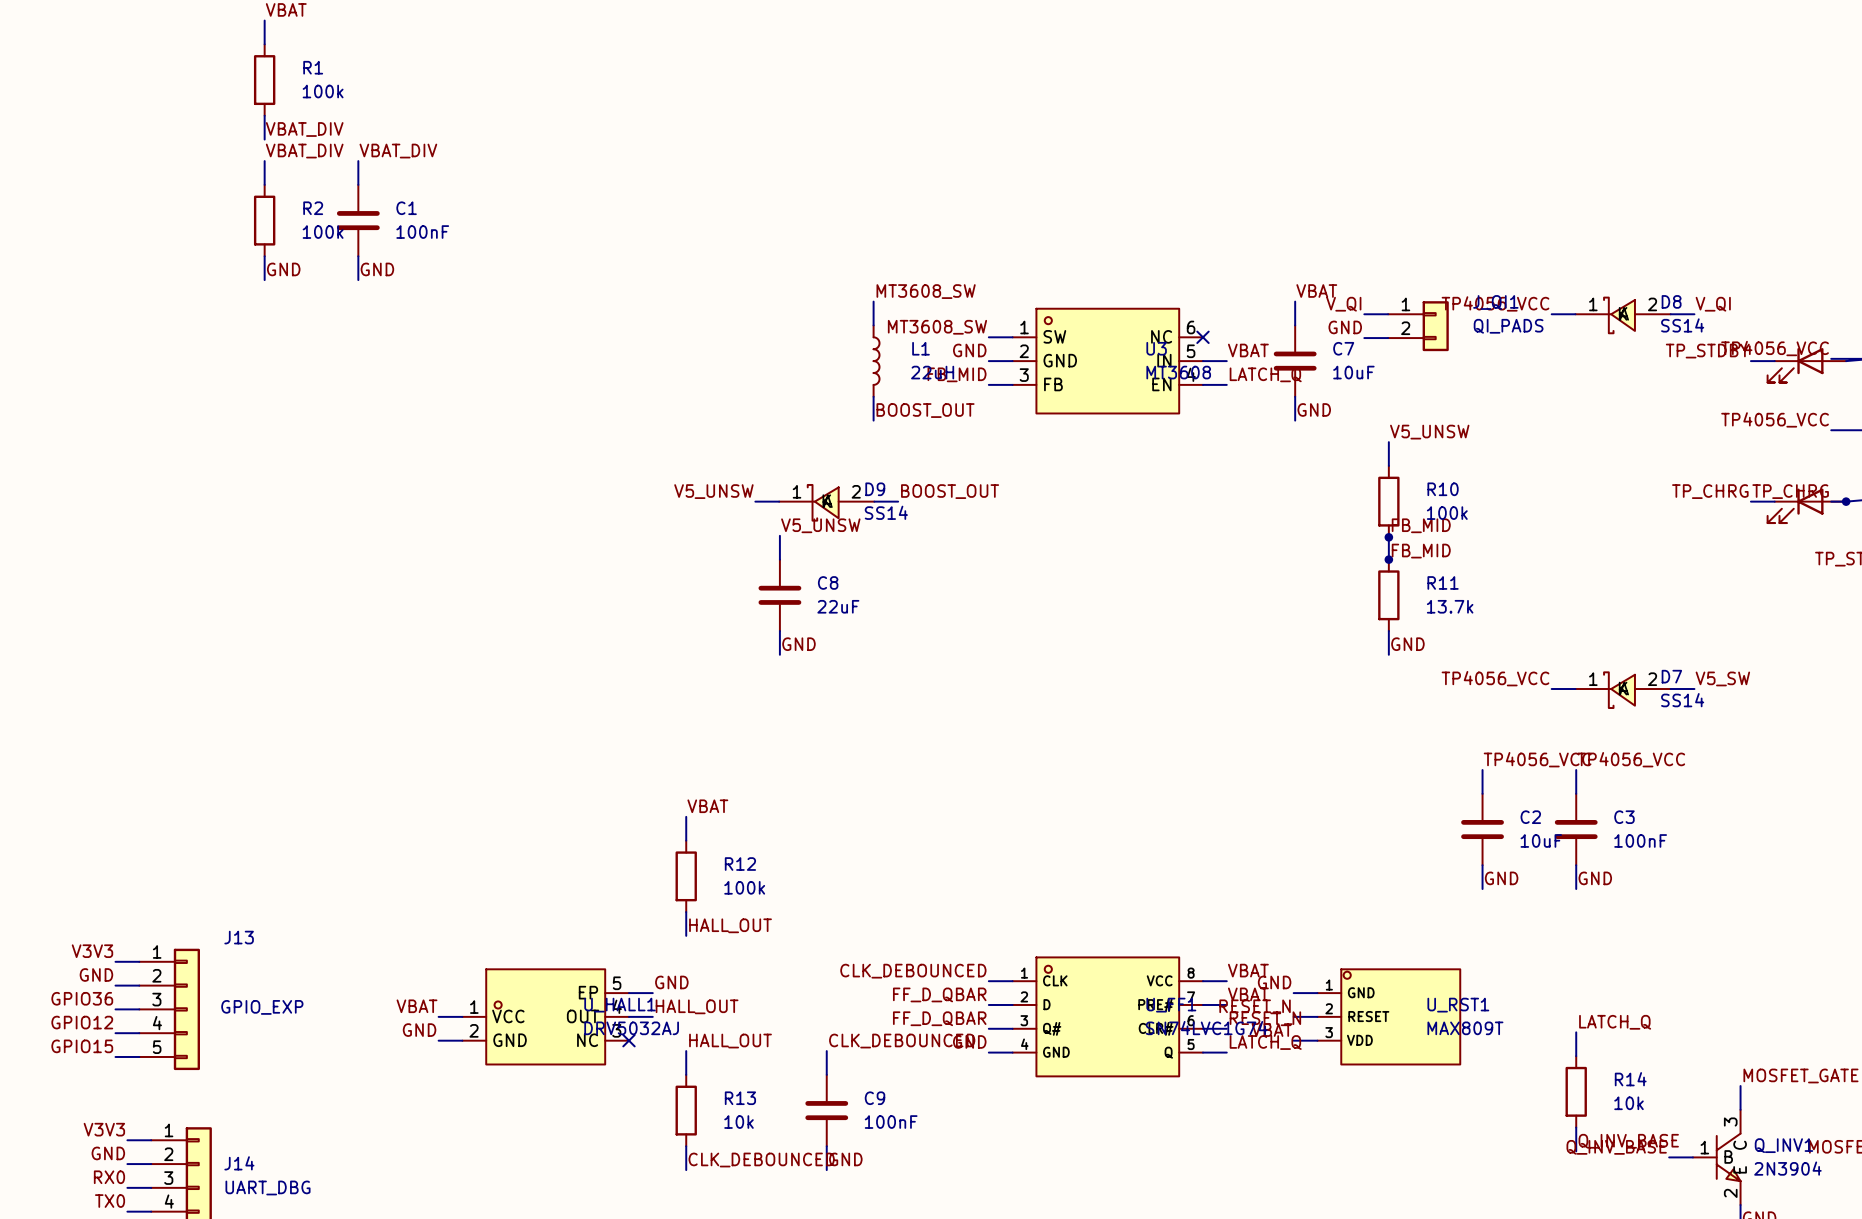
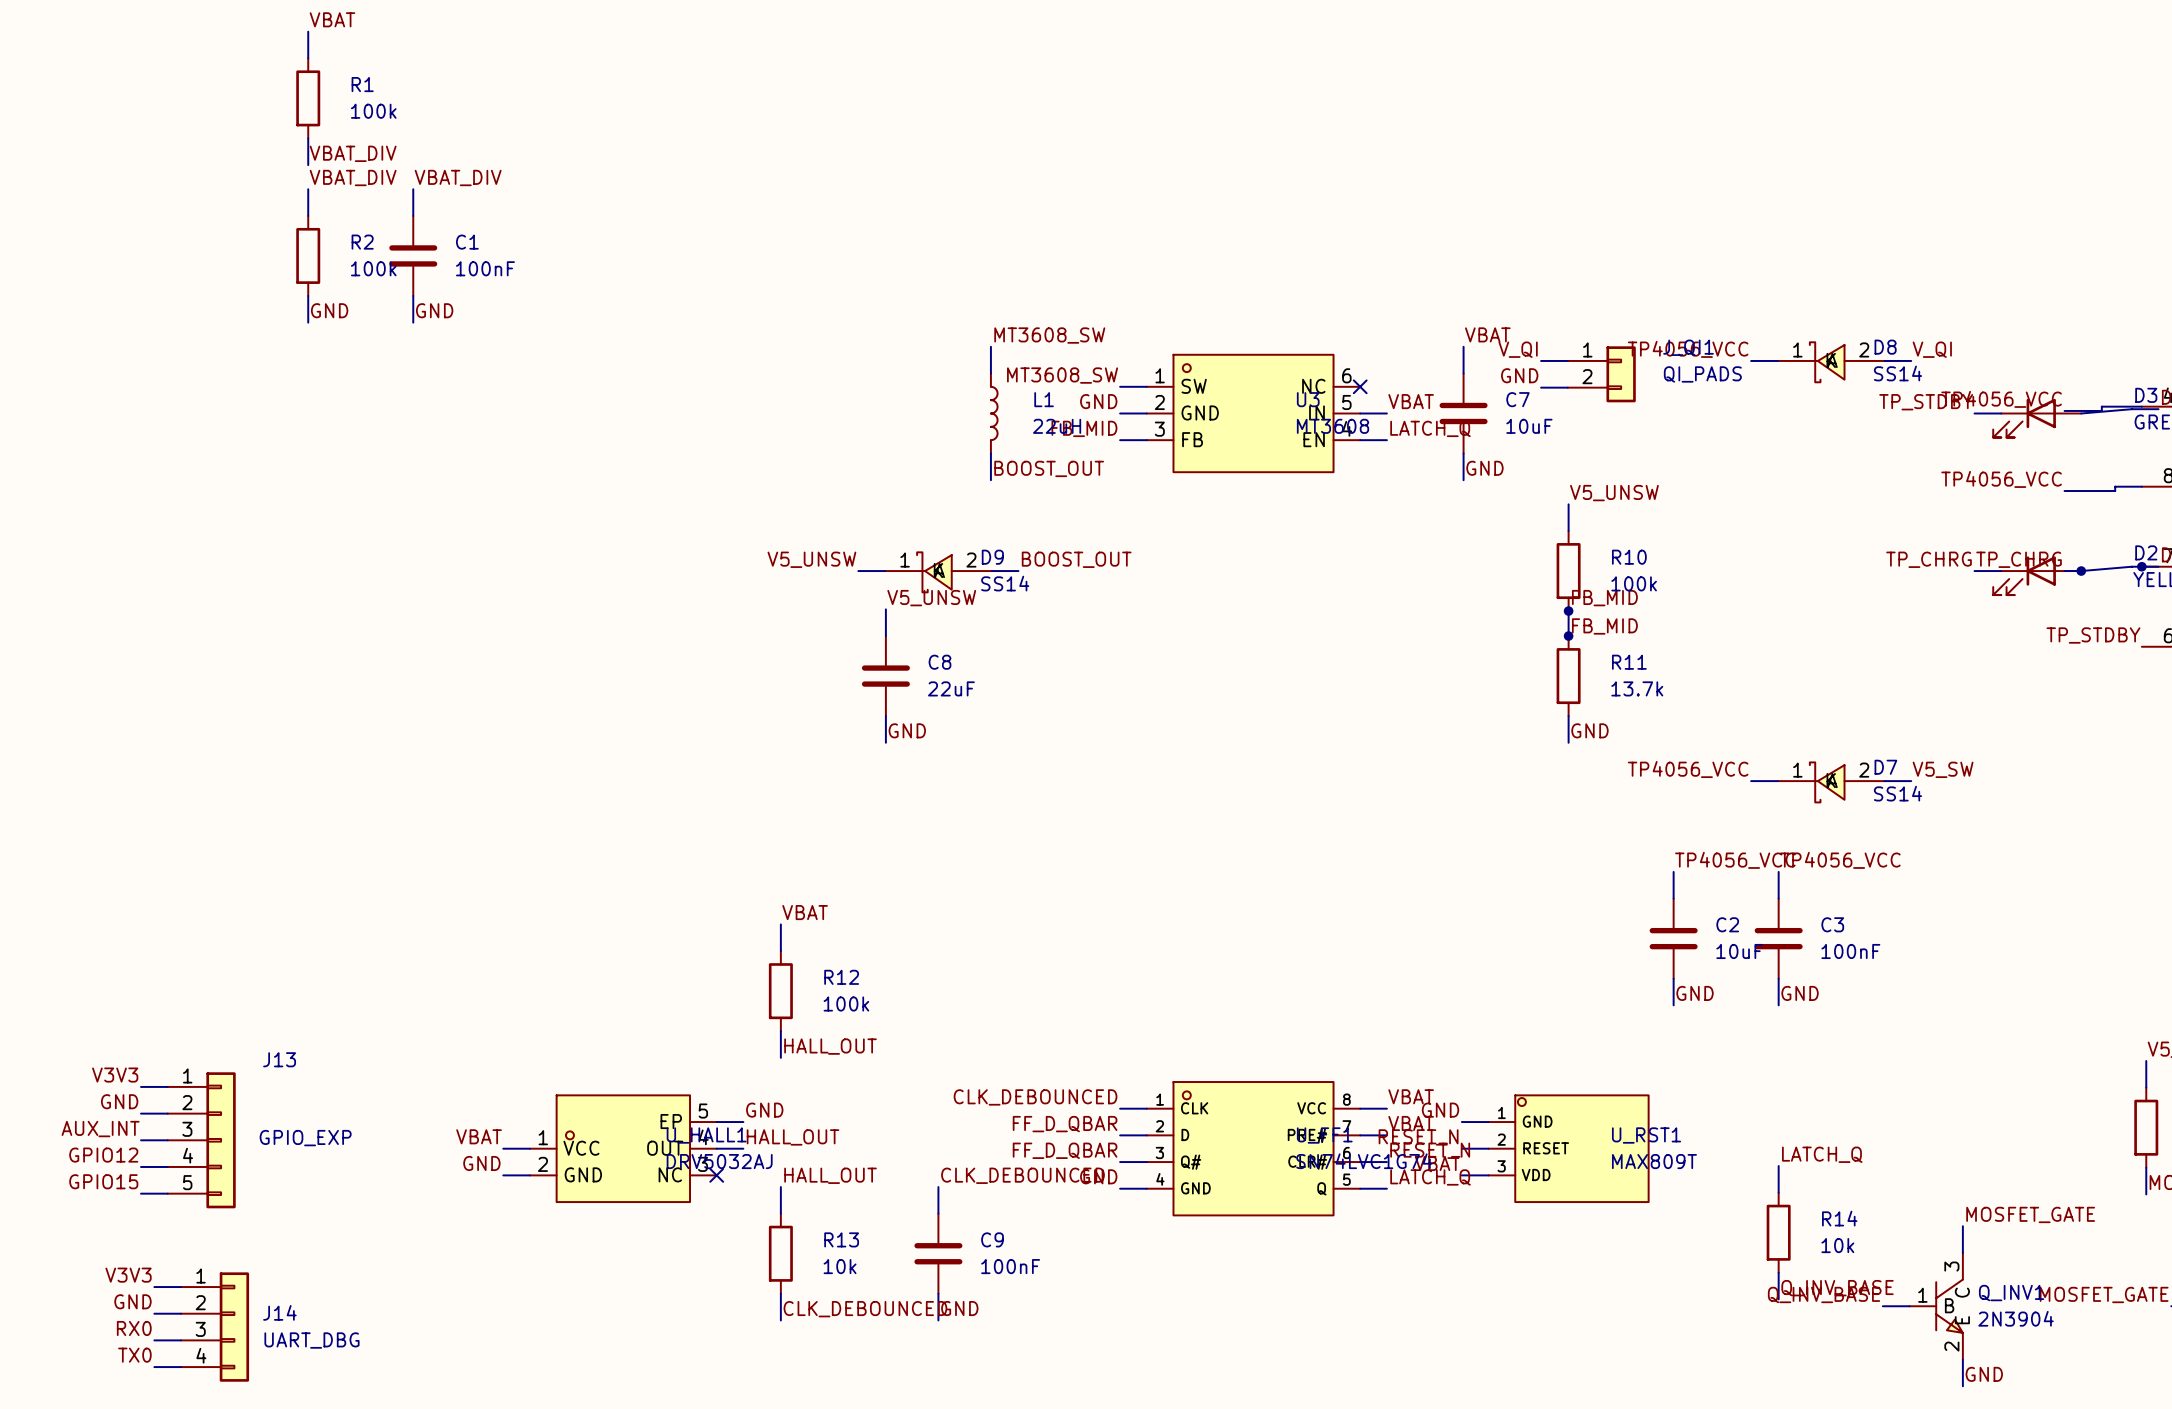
label: GPIO36 (82, 998) -> AUX_INT (100, 1129)

